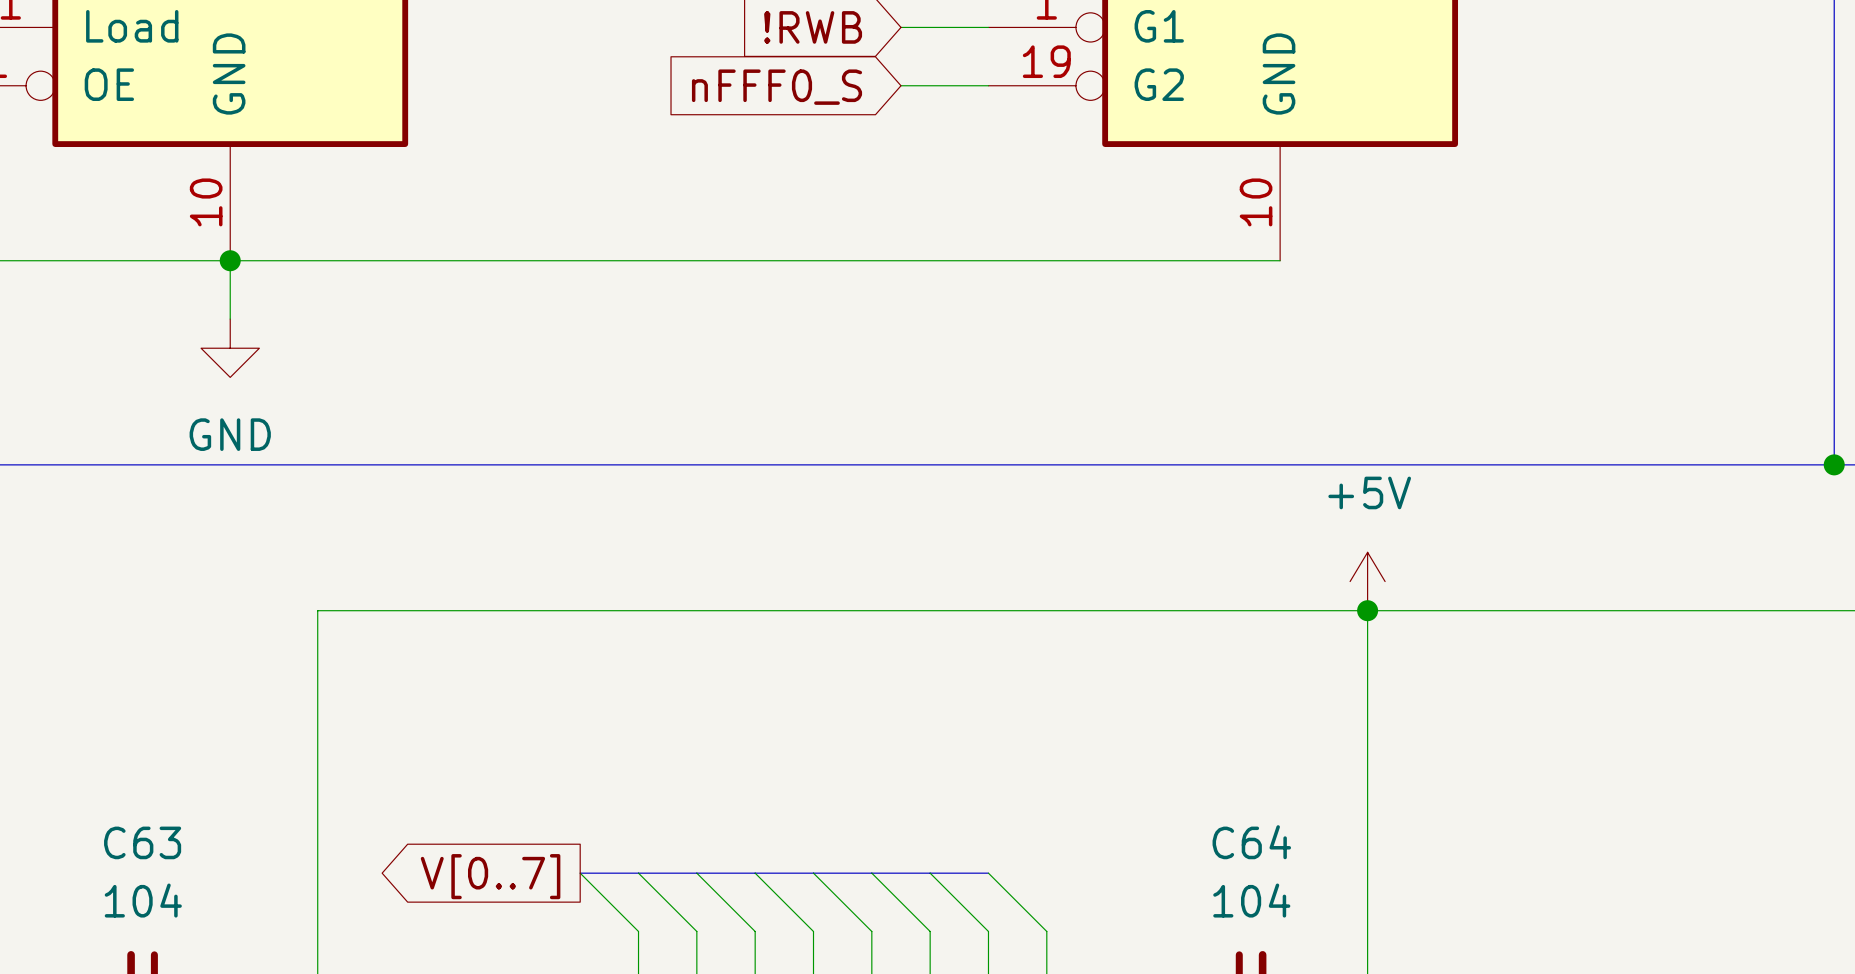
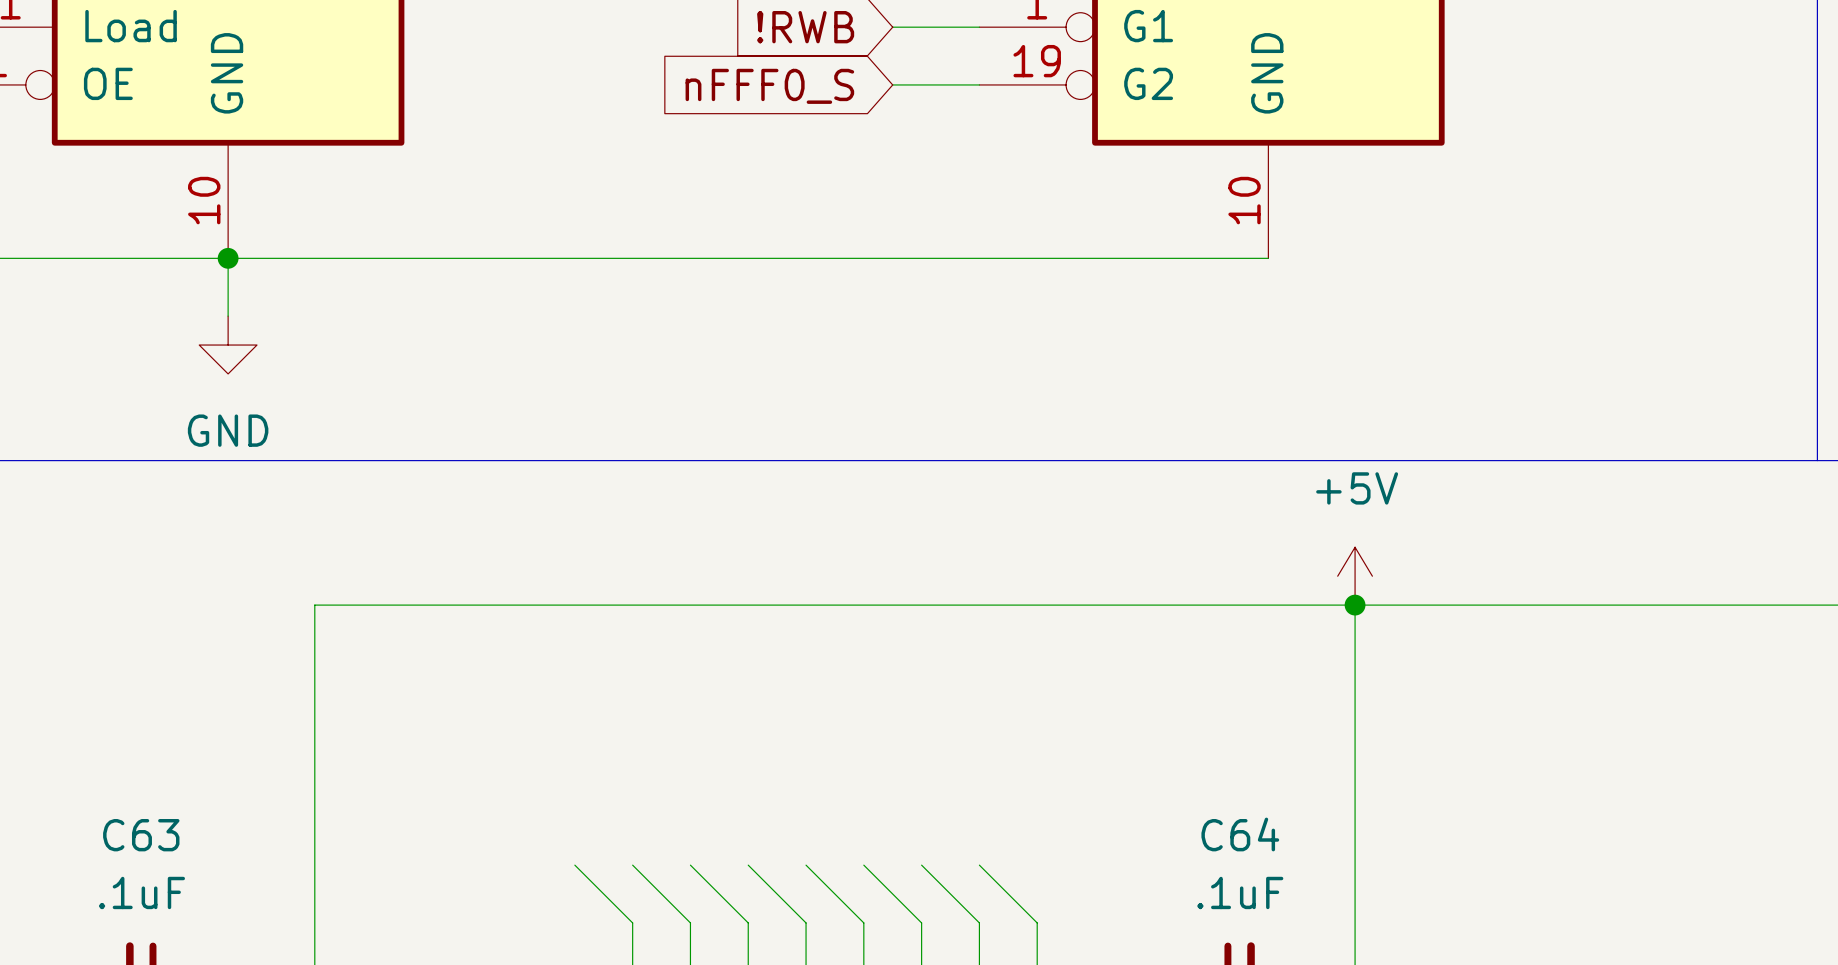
junction: (1834, 464) -> none
bus: (580, 873) (988, 873) -> none
global label: V[0..7] (490, 876) -> none
C63 value: 104 (143, 900) -> .1uF (141, 892)
C64 value: 104 (1251, 900) -> .1uF (1240, 892)

